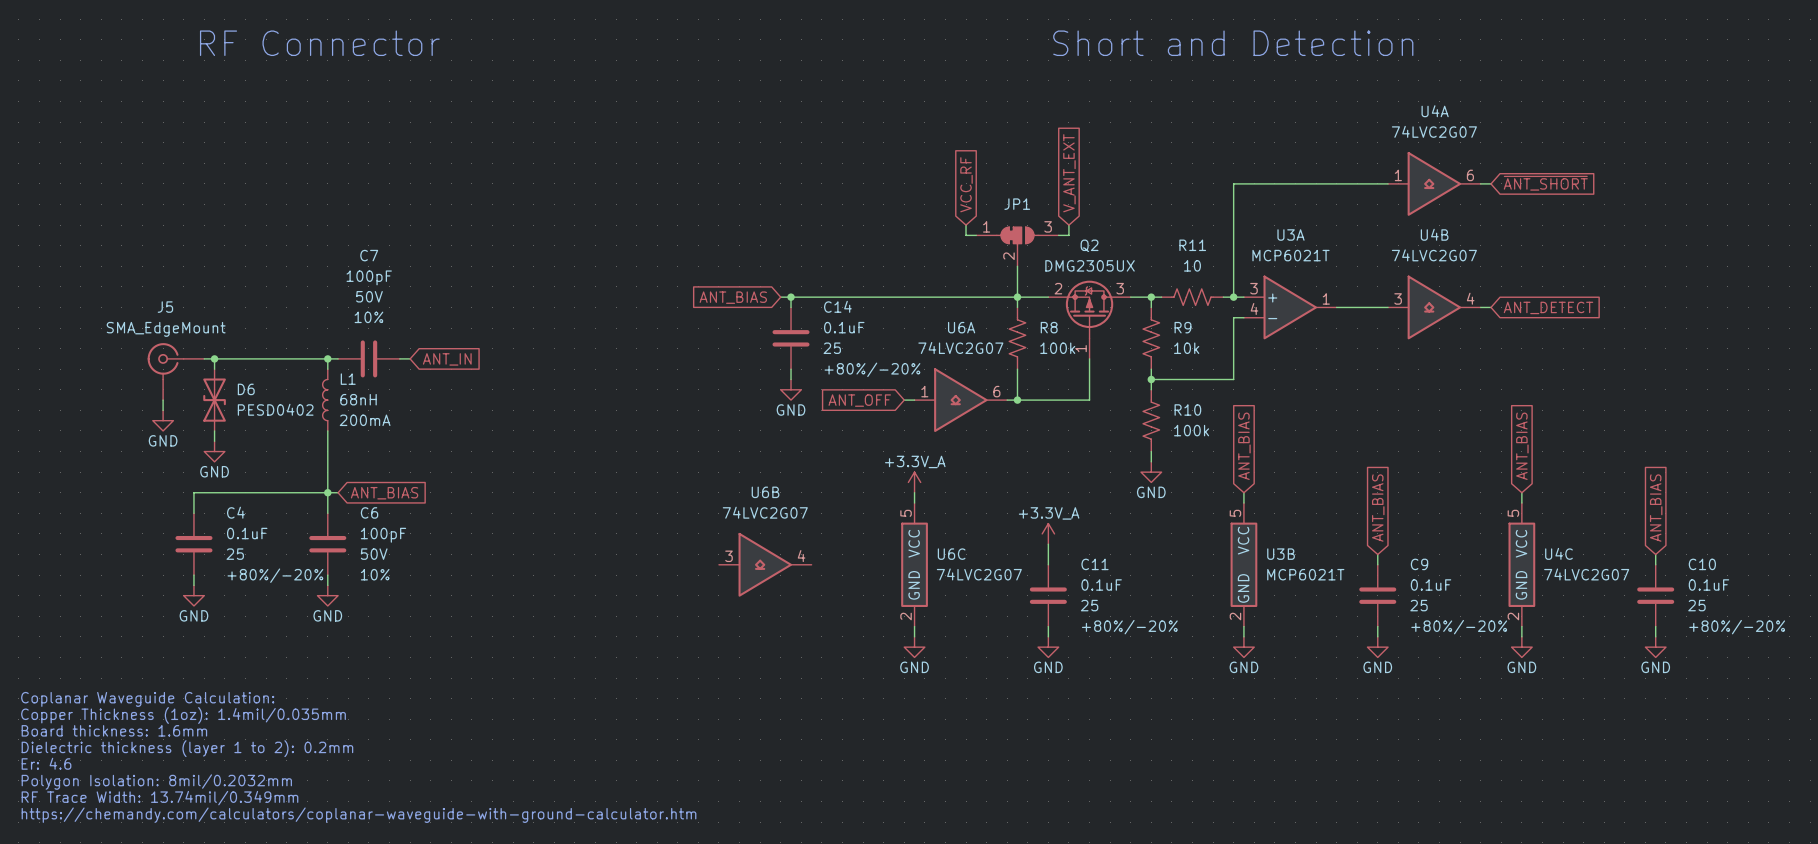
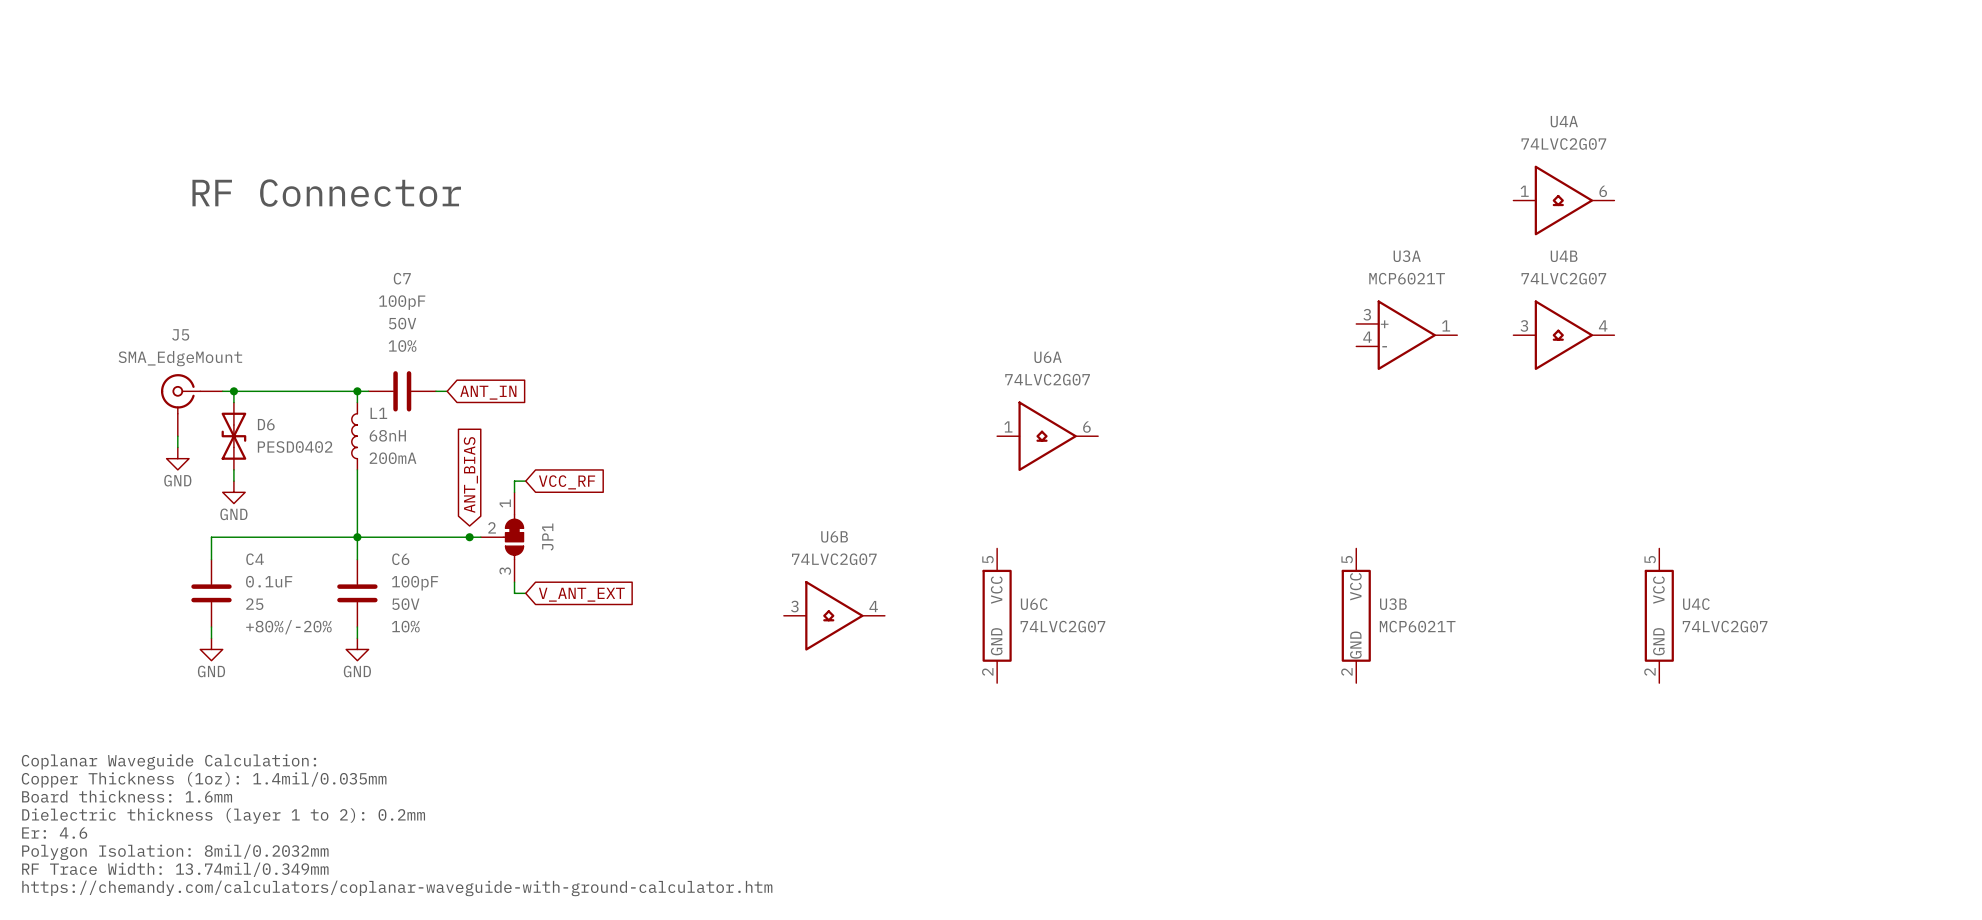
text position: RF Connector (319, 43) -> RF Connector (326, 193)
text: Short and Detection (1233, 43) -> none
global label: V_ANT_EXT (1069, 173) -> none
wire: (1388, 183) (1233, 183) (1233, 297) -> none
wire: (1480, 183) (1490, 183) -> none
global label: ~{ANT_SHORT} (1545, 183) -> none
global label: VCC_RF (966, 184) -> none
wire: (966, 225) (966, 235) (976, 235) -> none
wire: (1068, 225) (1068, 235) (1058, 235) -> none
JP1 rotation: 0° (1017, 236) -> 90° clockwise (513, 537)
JP1 position: (1017, 246) -> (502, 537)
wire: (1017, 266) (1017, 307) -> none
global label: ANT_BIAS (733, 297) -> none
wire: (780, 297) (1048, 297) -> none
wire: (791, 297) (791, 307) -> none
junction: (791, 297) -> none
junction: (1017, 297) -> none
wire: (1130, 297) (1161, 297) -> none
wire: (1151, 297) (1151, 307) -> none
junction: (1151, 297) -> none
R11: 10 (1192, 297) -> none
wire: (1223, 297) (1243, 297) -> none
junction: (1233, 297) -> none
wire: (1336, 307) (1388, 307) -> none
wire: (1480, 307) (1490, 307) -> none
global label: ANT_DETECT (1548, 307) -> none
wire: (1243, 317) (1233, 317) (1233, 379) (1151, 379) -> none
Q2: DMG2305UX (1089, 319) -> none
C14: 0.1uF (791, 338) -> none
R8: 100k (1017, 338) -> none
R9: 10k (1151, 338) -> none
wire: (1089, 358) (1089, 400) (1007, 400) -> none
wire: (791, 369) (791, 379) -> none
wire: (1017, 369) (1017, 400) -> none
wire: (1151, 369) (1151, 389) -> none
junction: (1151, 379) -> none
power symbol: GND (791, 389) -> none
global label: ANT_OFF (859, 400) -> none
wire: (904, 400) (914, 400) -> none
junction: (1017, 400) -> none
R10: 100k (1151, 420) -> none
wire: none -> (525, 481) (514, 481) (514, 492)
global label: none -> VCC_RF (567, 482)
global label: ANT_BIAS (1244, 446) -> none
global label: ANT_BIAS (1522, 446) -> none
wire: (1151, 451) (1151, 461) -> none
power symbol: GND (1151, 472) -> none
power symbol: +3.3V_A (914, 482) -> none
wire: none -> (368, 537) (480, 537)
junction: none -> (469, 537)
wire: (914, 492) (914, 503) -> none
wire: (1243, 492) (1243, 503) -> none
wire: (1521, 492) (1521, 503) -> none
global label rotation: 0° (384, 493) -> 90° counterclockwise (470, 475)
global label: ANT_BIAS (1378, 508) -> none
global label: ANT_BIAS (1656, 508) -> none
wire: none -> (514, 582) (514, 593) (525, 593)
power symbol: +3.3V_A (1048, 533) -> none
global label: none -> V_ANT_EXT (581, 594)
wire: (1048, 544) (1048, 564) -> none
wire: (1377, 554) (1377, 564) -> none
wire: (1655, 554) (1655, 564) -> none
C11: 0.1uF (1048, 595) -> none
C9: 0.1uF (1377, 595) -> none
C10: 0.1uF (1655, 595) -> none
wire: (914, 626) (914, 636) -> none
wire: (1048, 626) (1048, 636) -> none
wire: (1243, 626) (1243, 636) -> none
wire: (1377, 626) (1377, 636) -> none
wire: (1521, 626) (1521, 636) -> none
wire: (1655, 626) (1655, 636) -> none
power symbol: GND (914, 647) -> none
power symbol: GND (1048, 647) -> none
power symbol: GND (1243, 647) -> none
power symbol: GND (1377, 647) -> none
power symbol: GND (1521, 647) -> none
power symbol: GND (1655, 647) -> none

